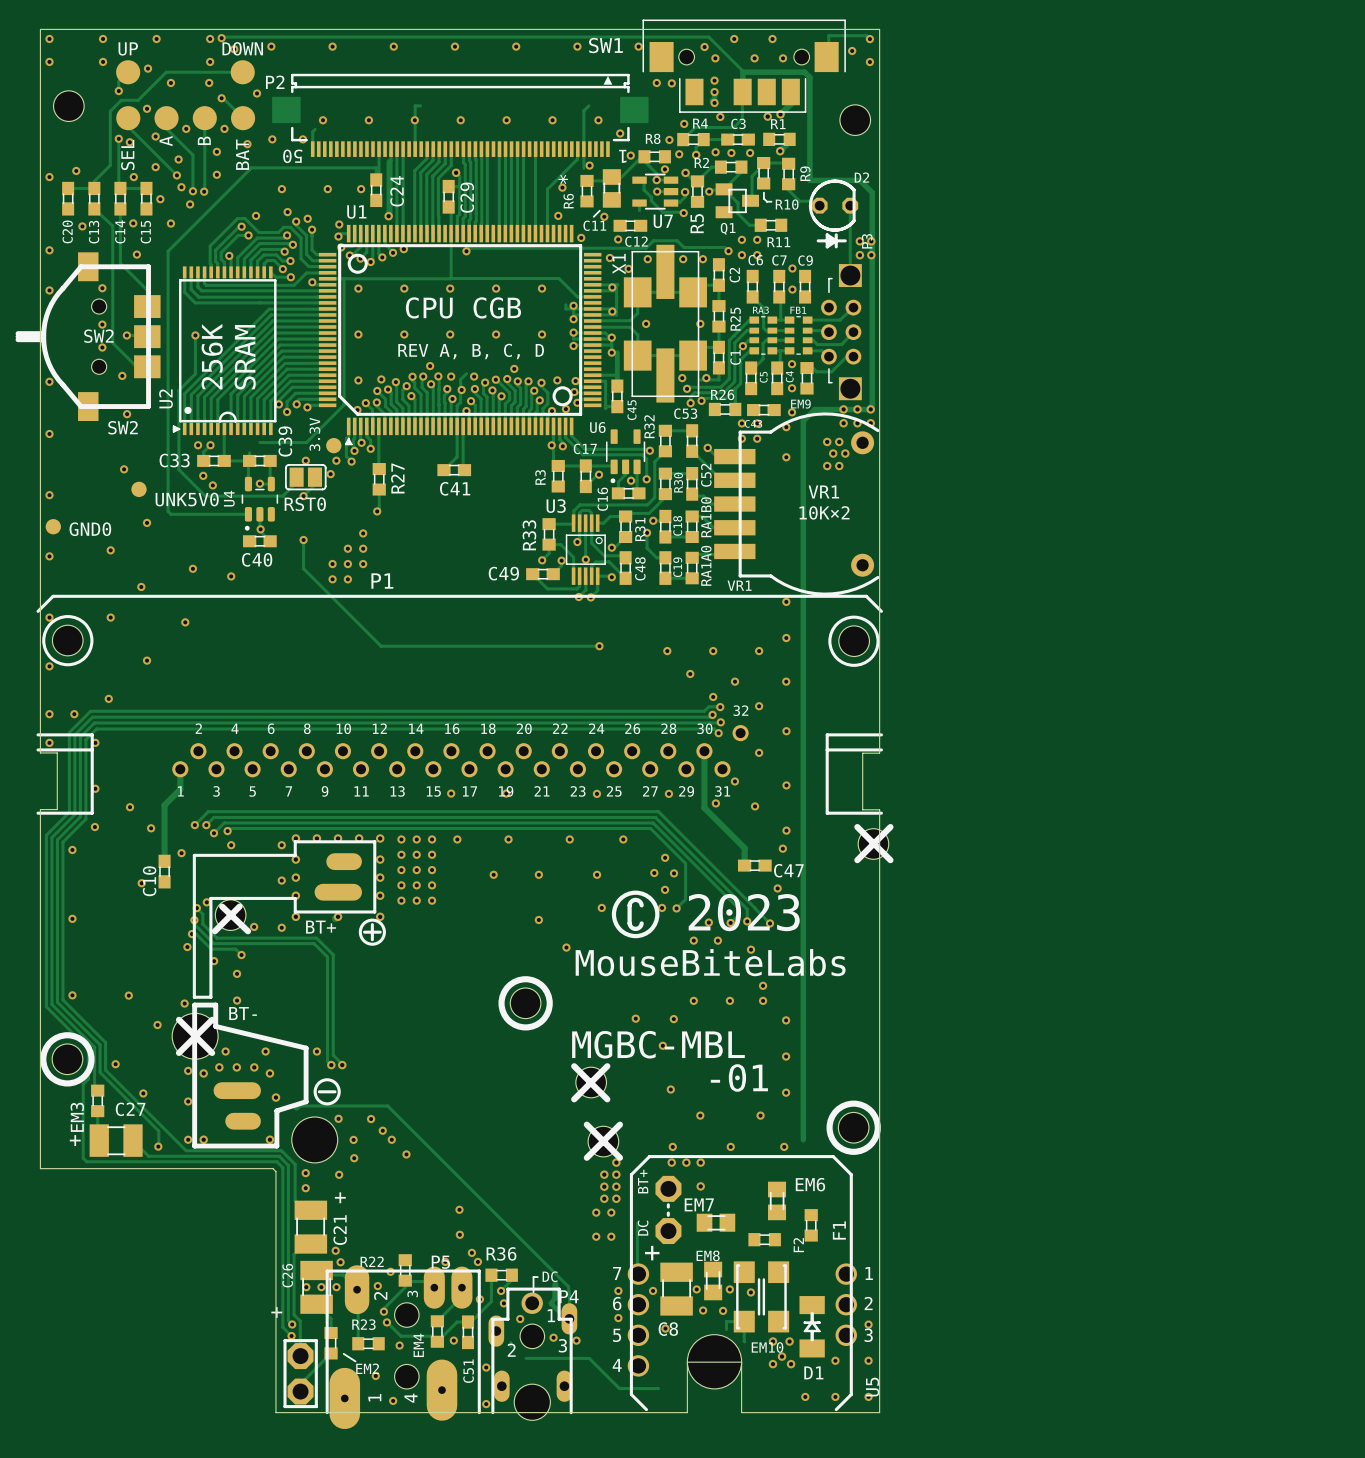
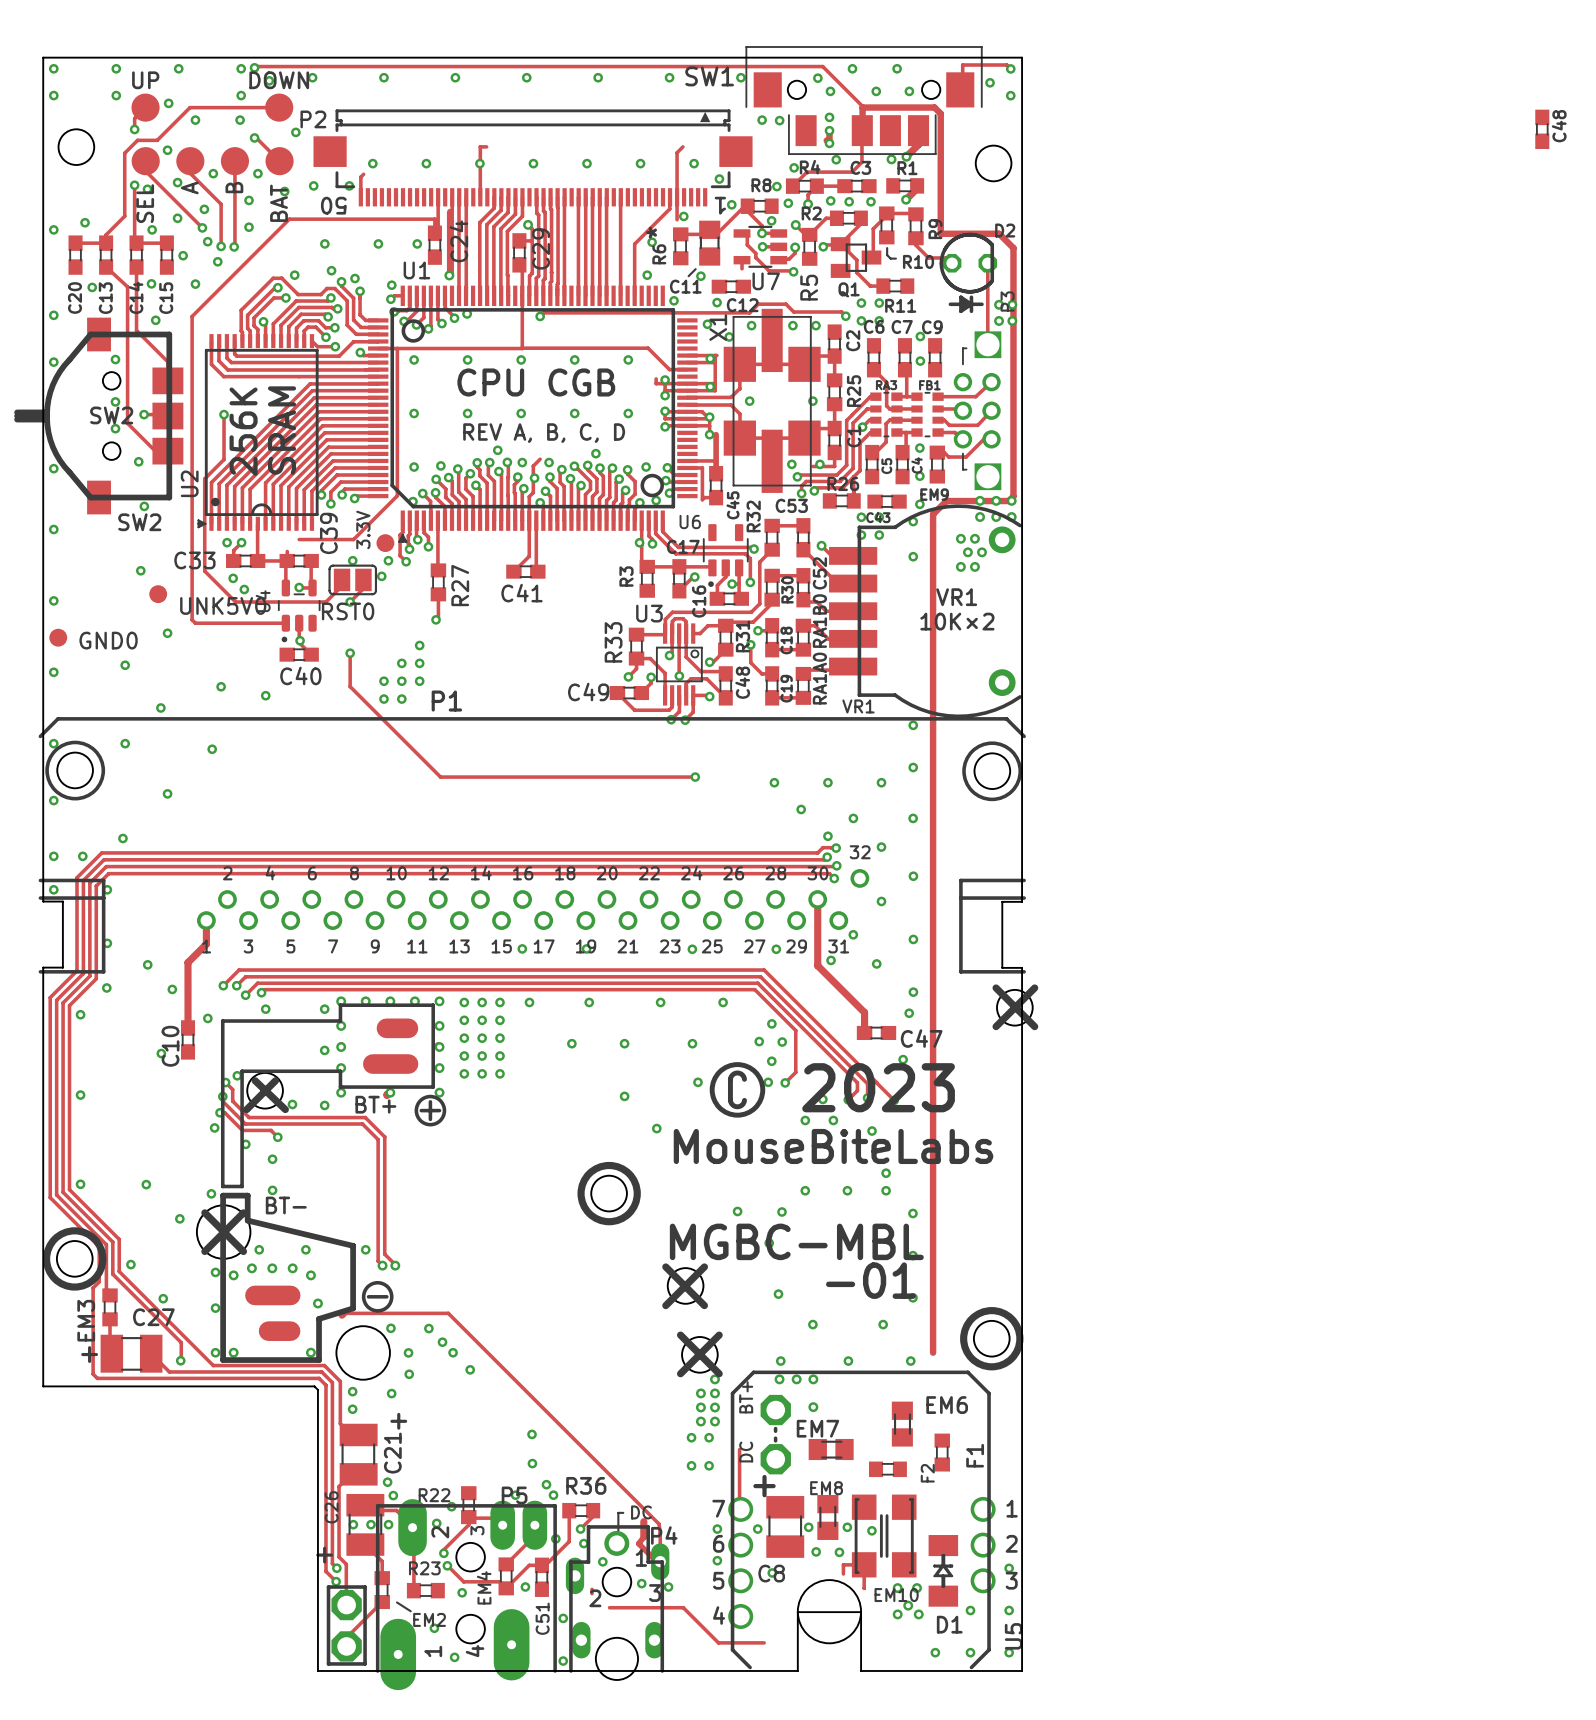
C48: none -> (1542, 129)

